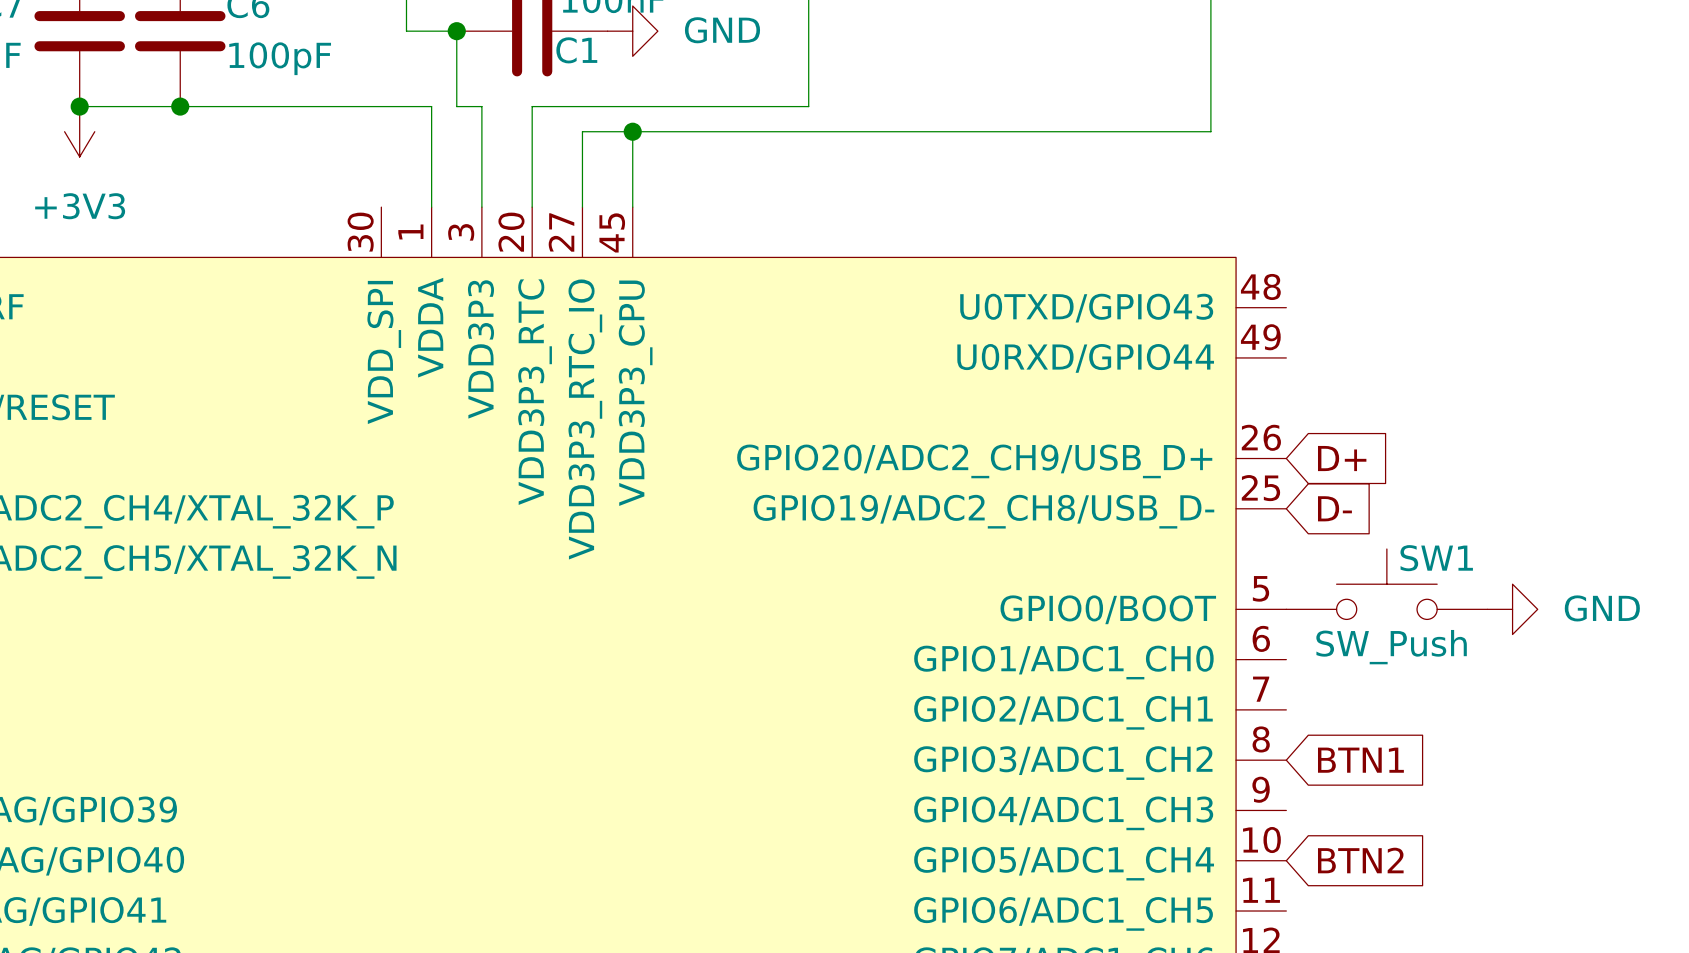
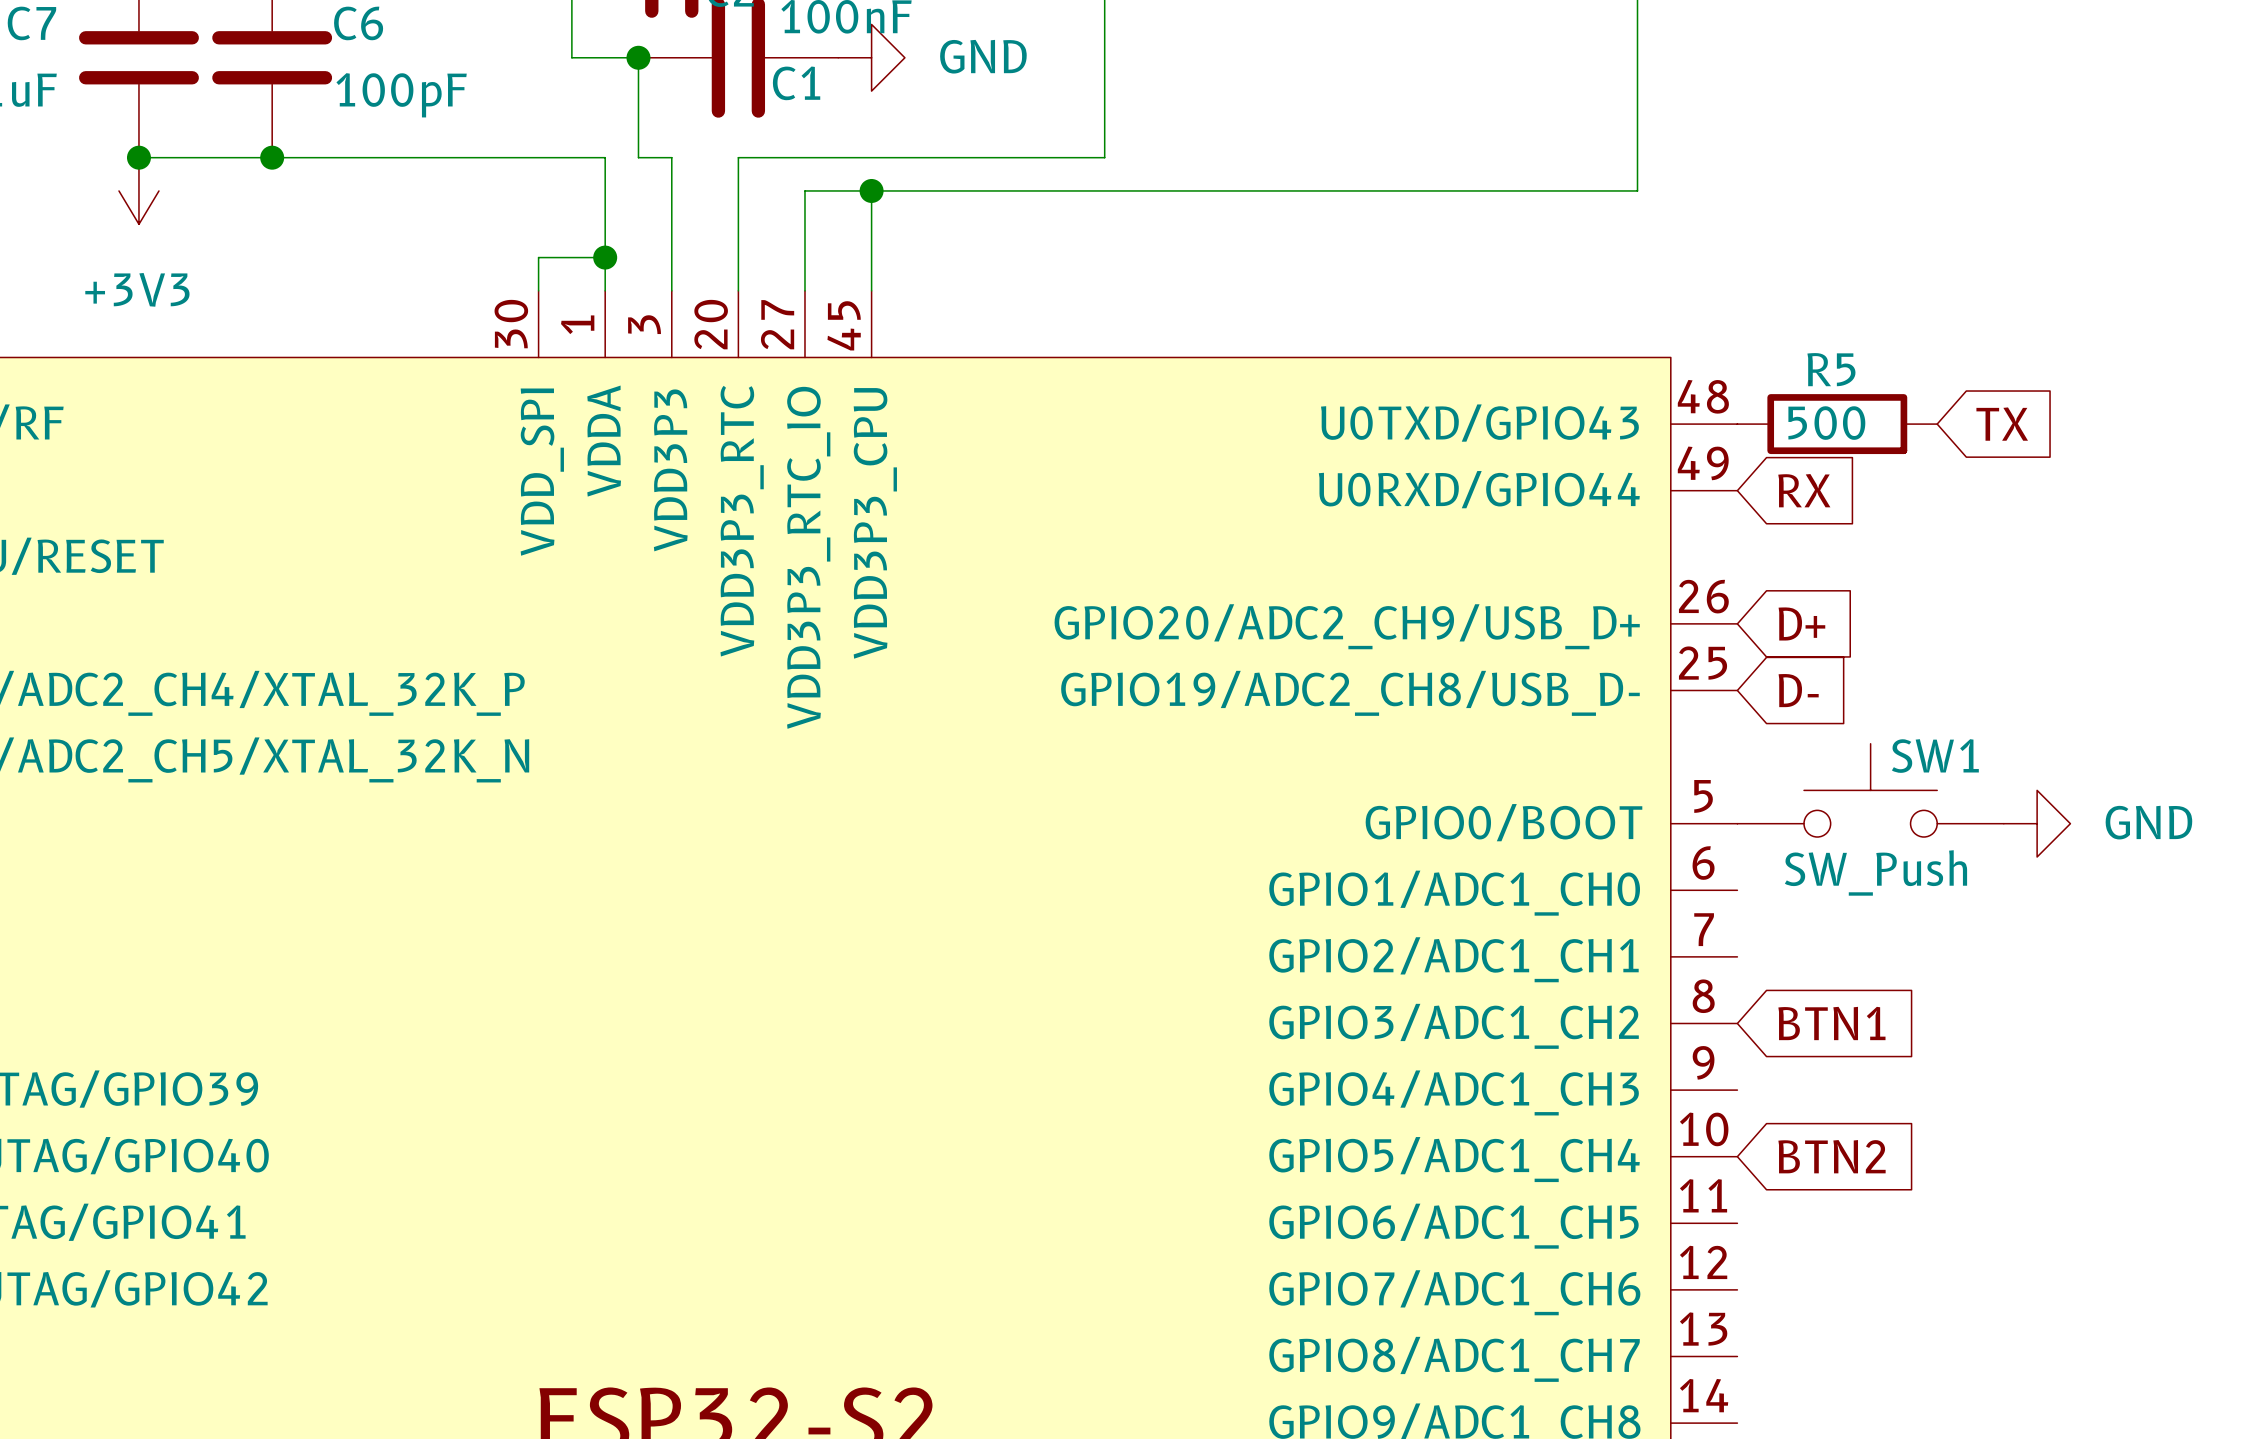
wire: none -> (605, 257) (538, 257) (538, 290)
junction: none -> (605, 257)
R5: none -> 500 (1837, 424)
global label: none -> TX (2002, 424)
global label: none -> RX (1804, 490)

